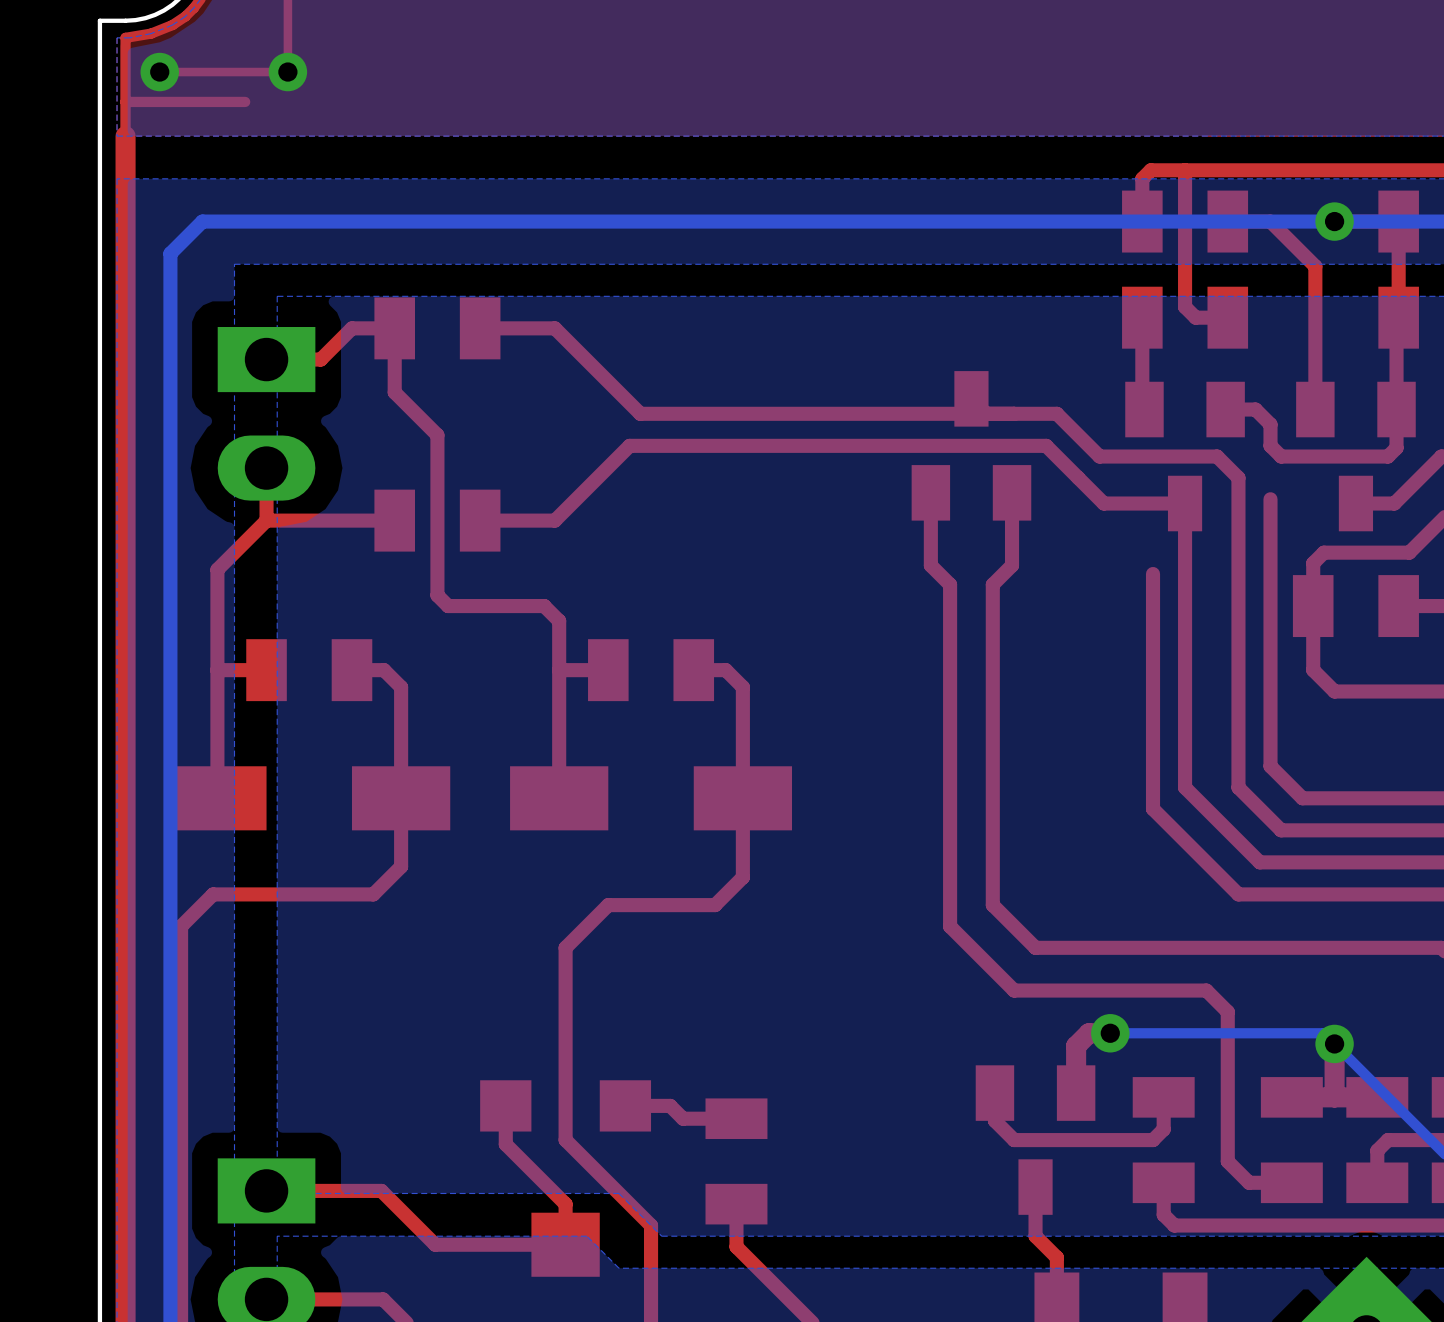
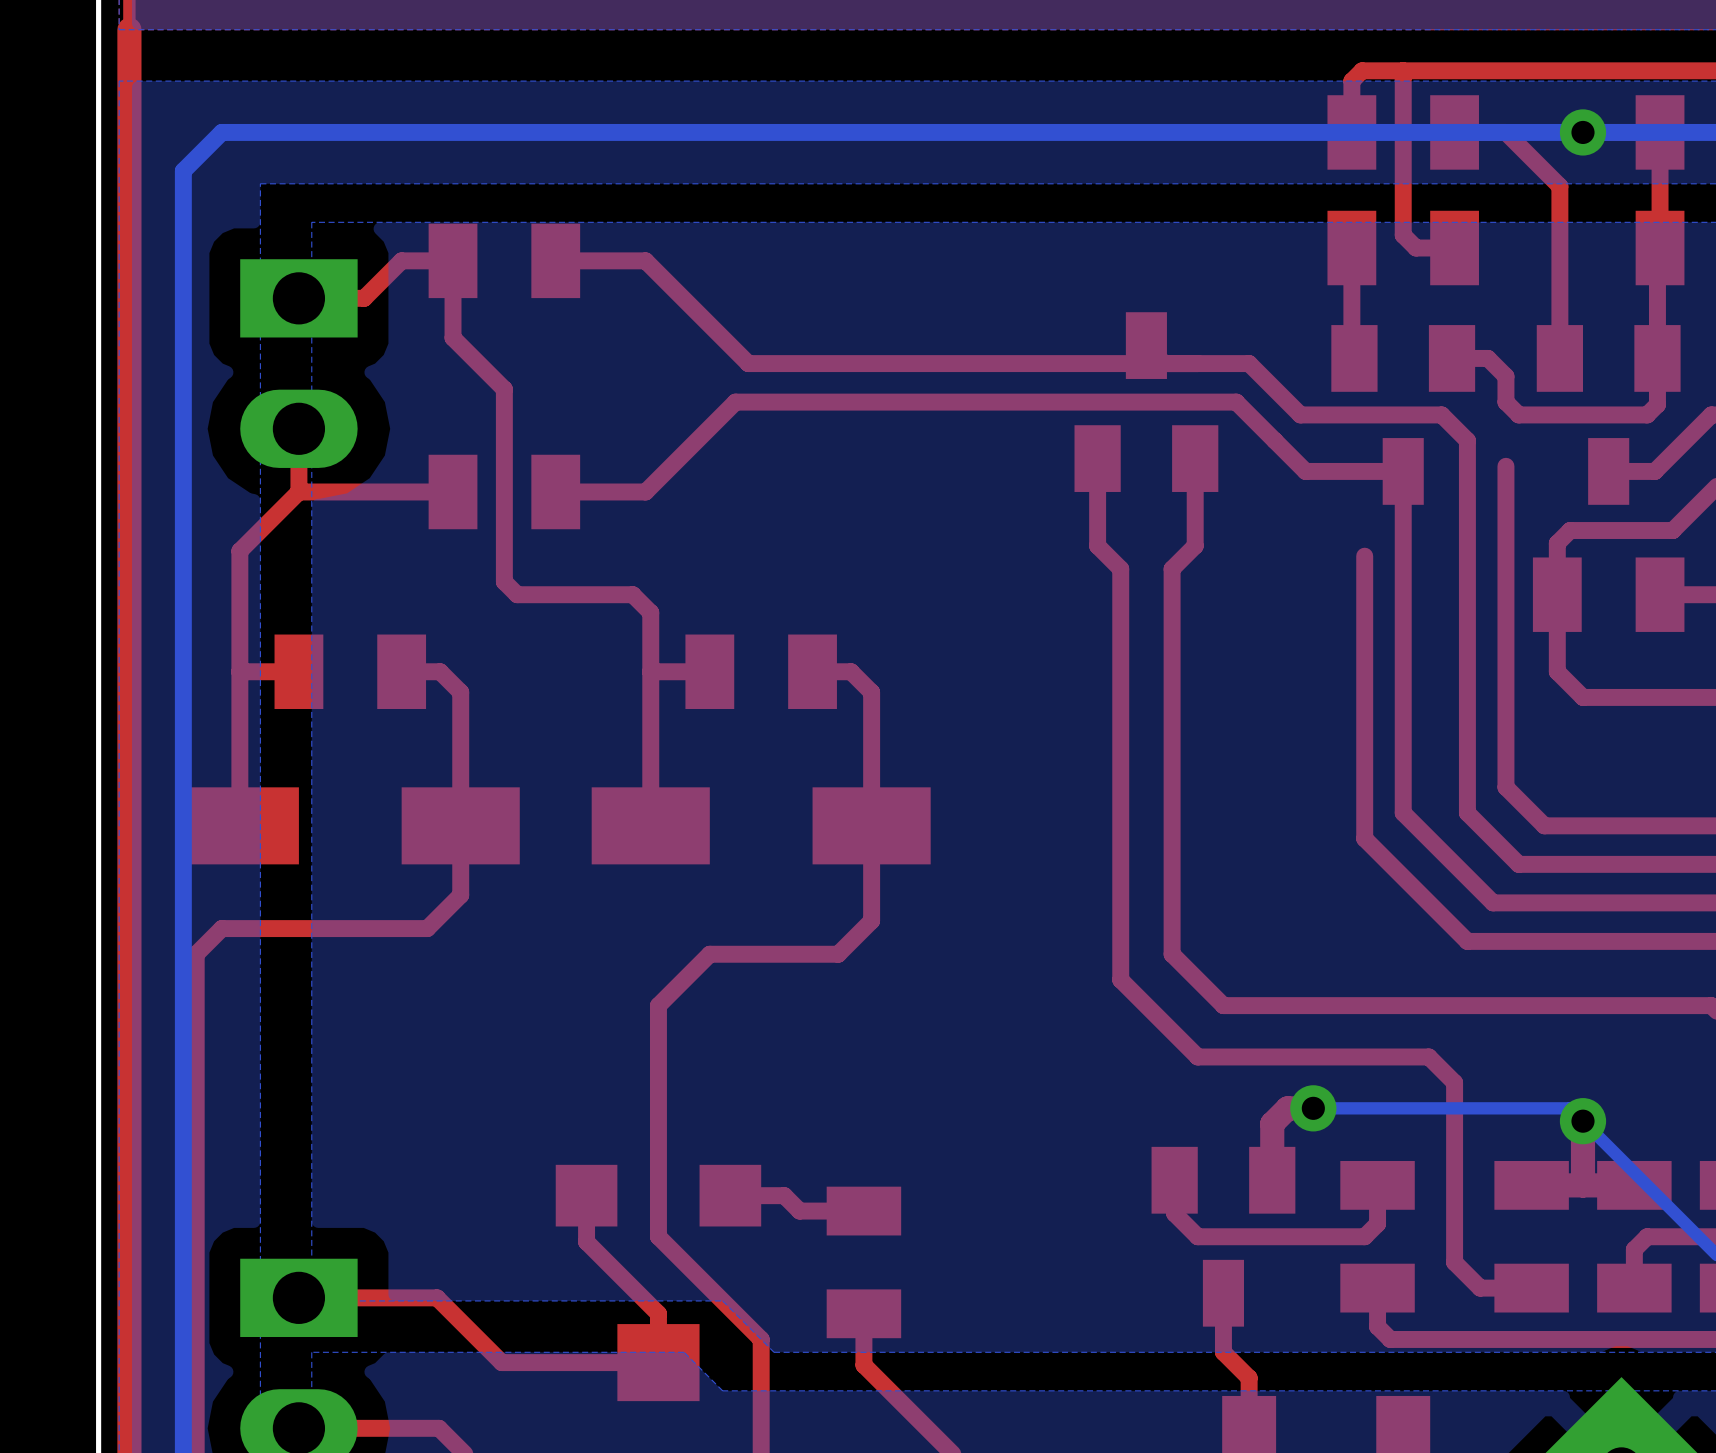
top track: (401, 855) (401, 866) (373, 894) (213, 894) (181, 926) -> (460, 895) (427, 928) (221, 928) (196, 954) (196, 979)

